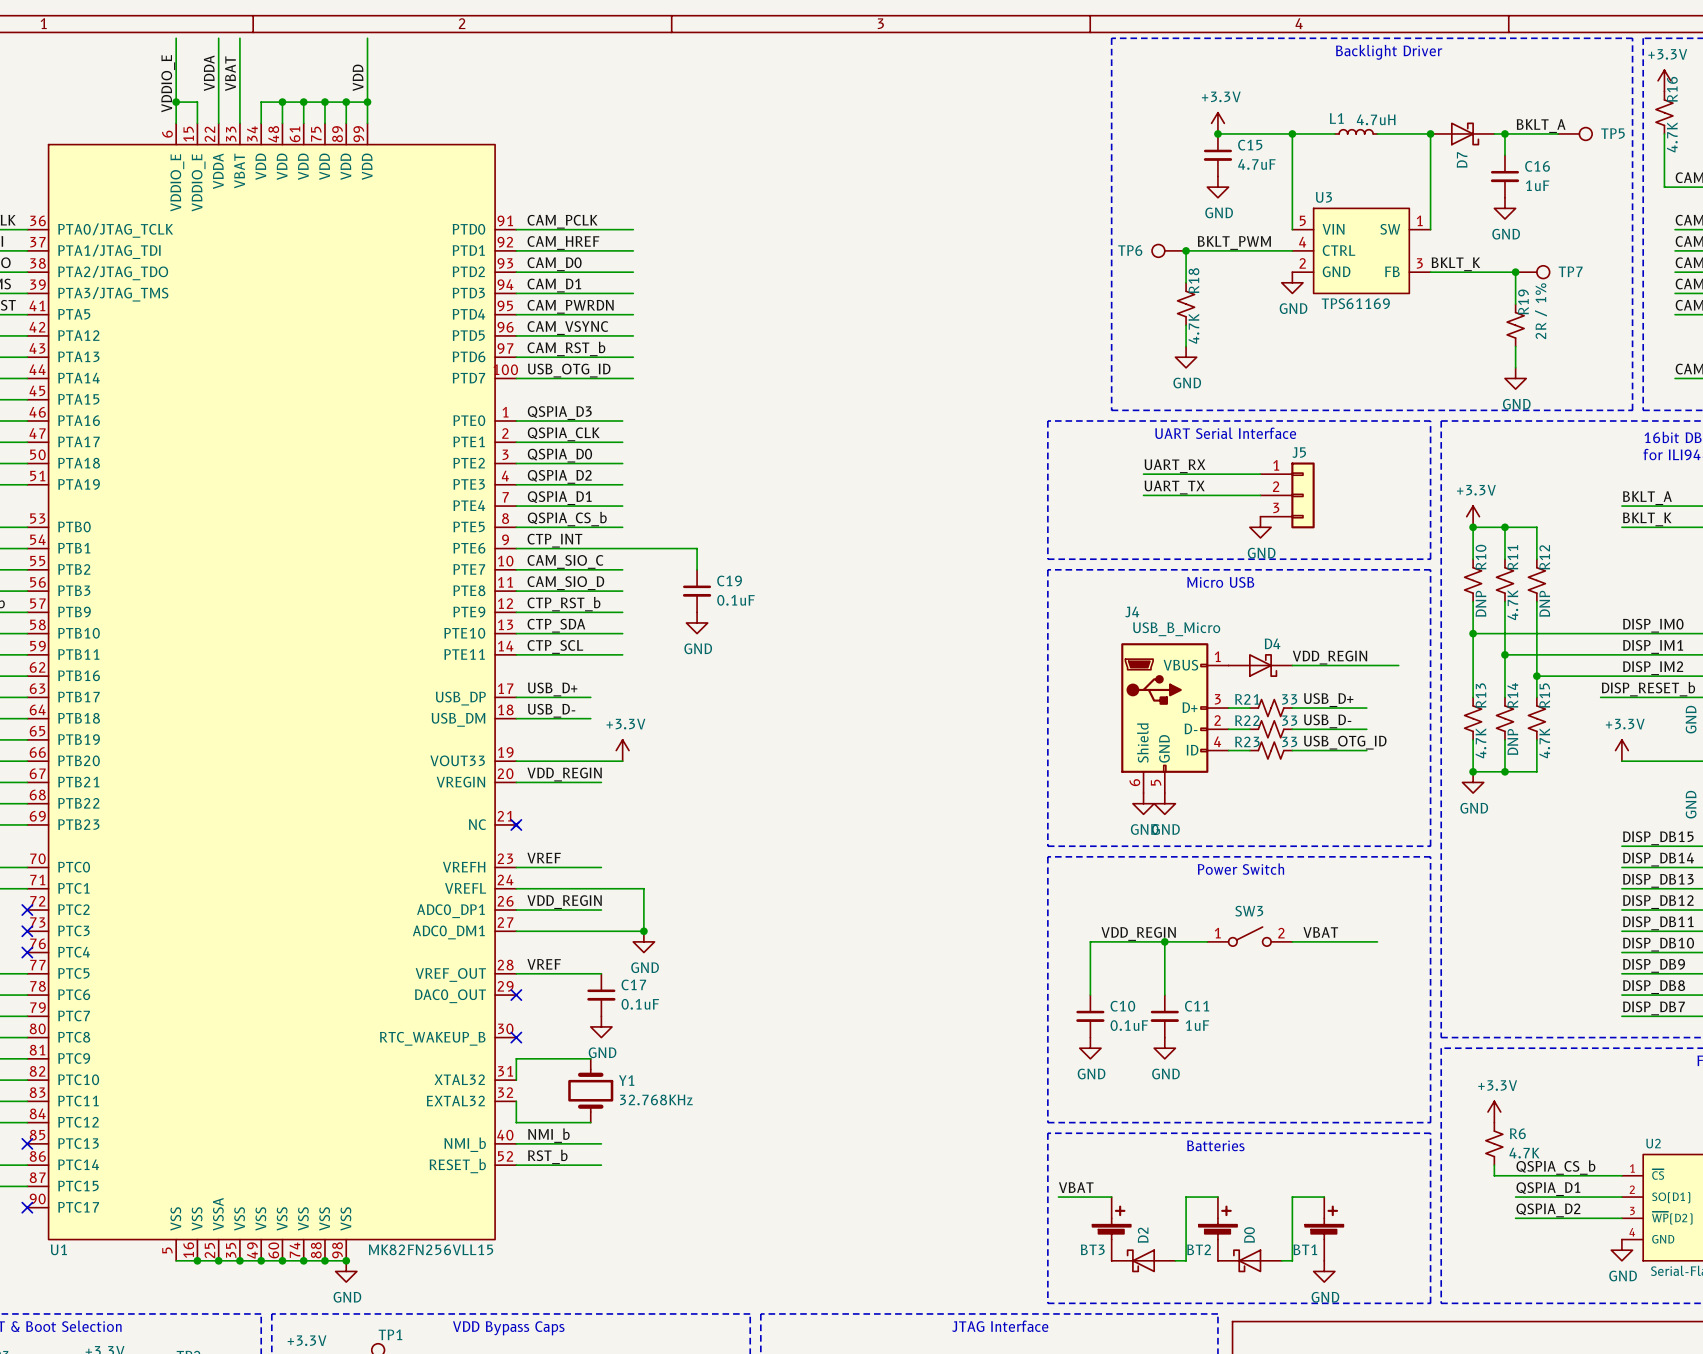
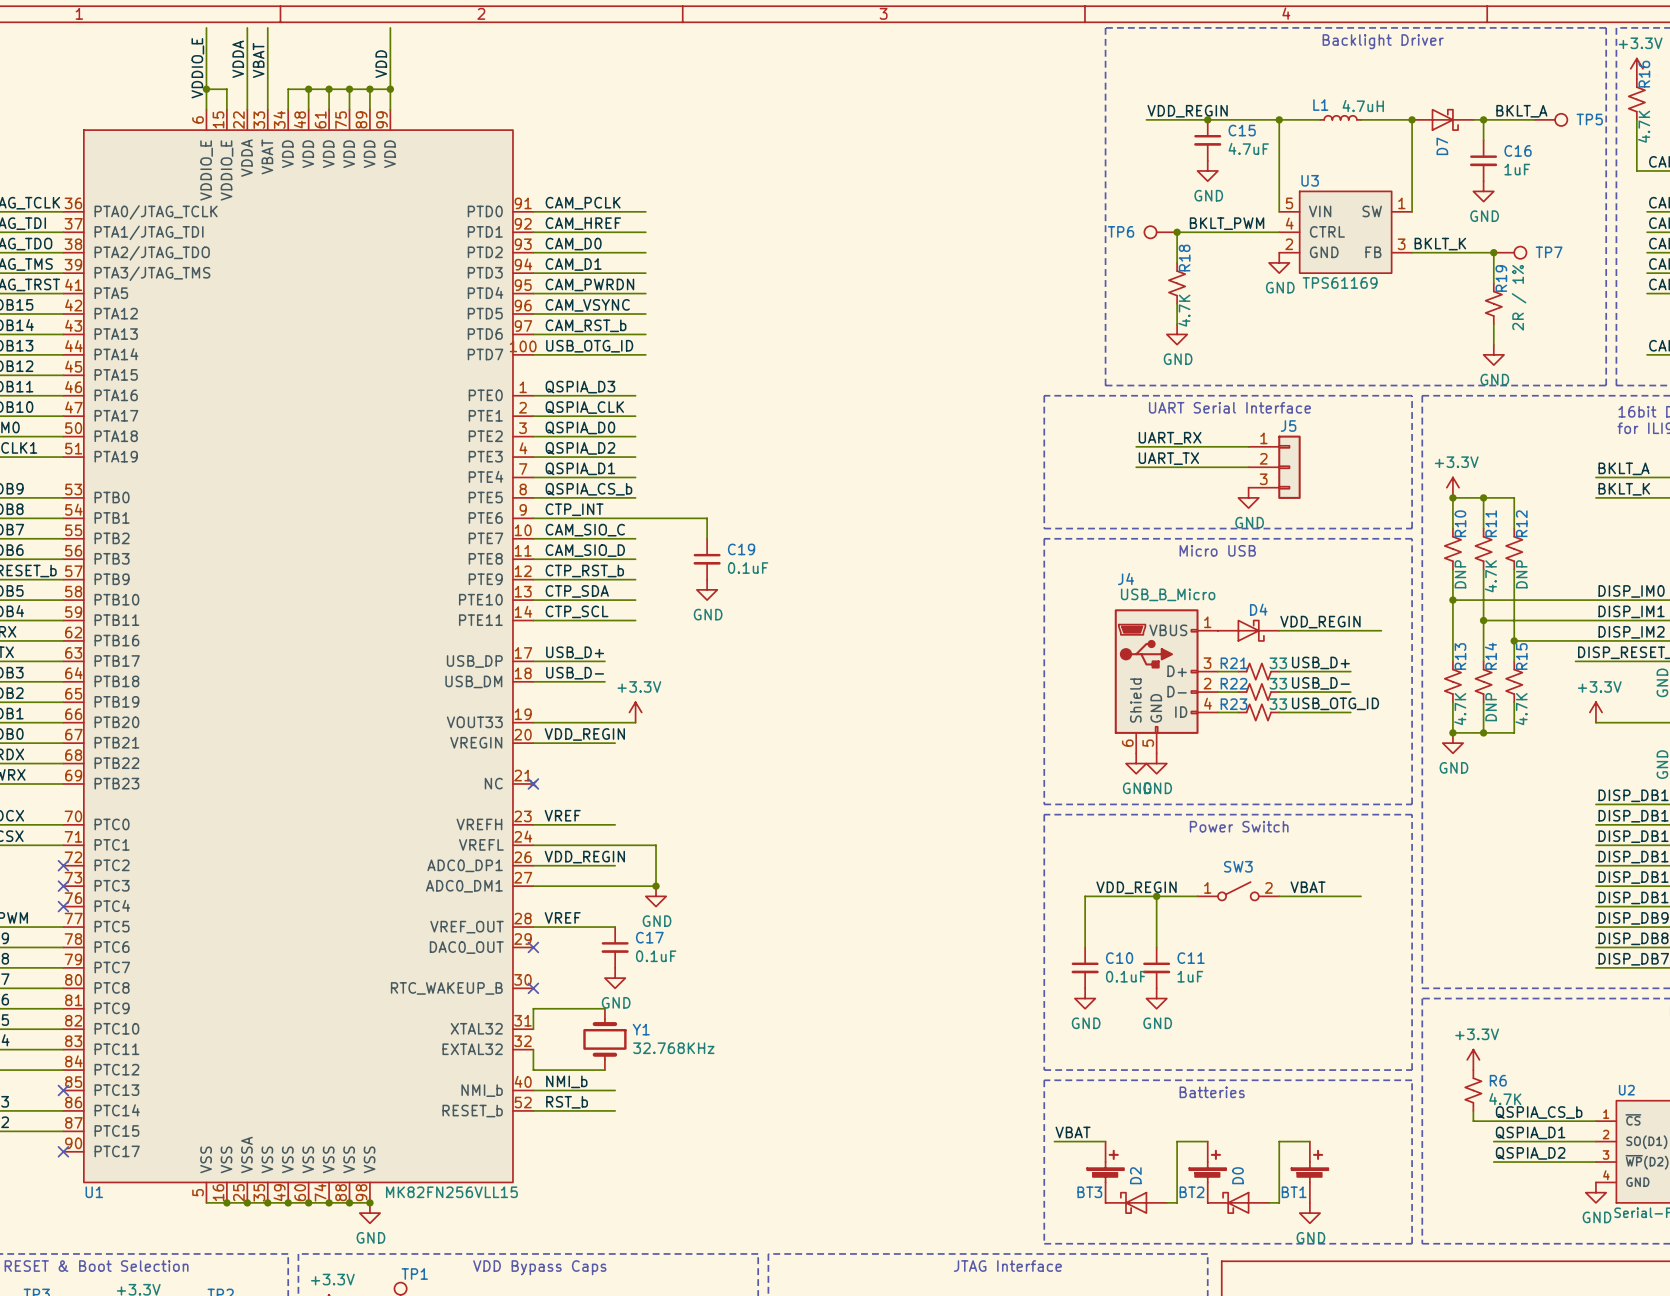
power symbol: +3.3V (1217, 123) -> none
label: none -> VDD_REGIN (1187, 111)
wire: none -> (1146, 119) (1207, 119)

